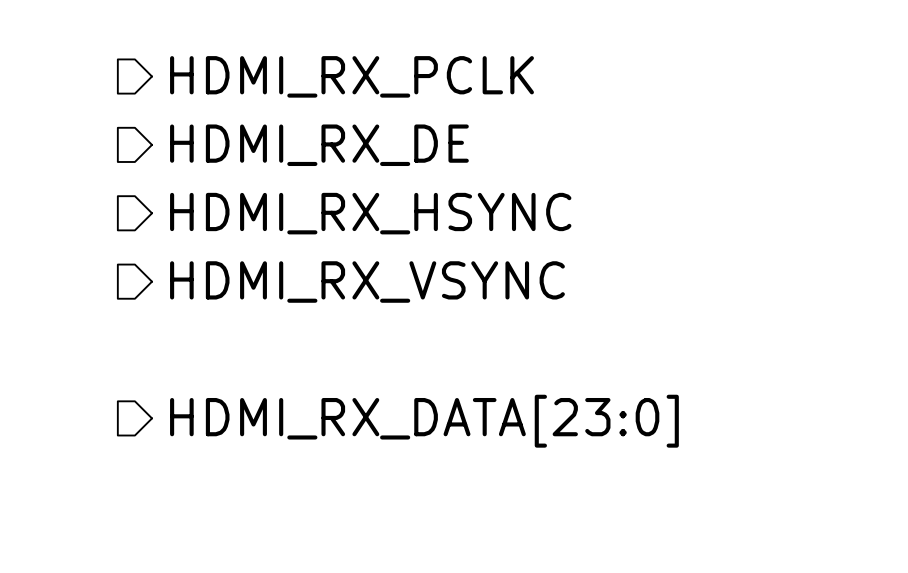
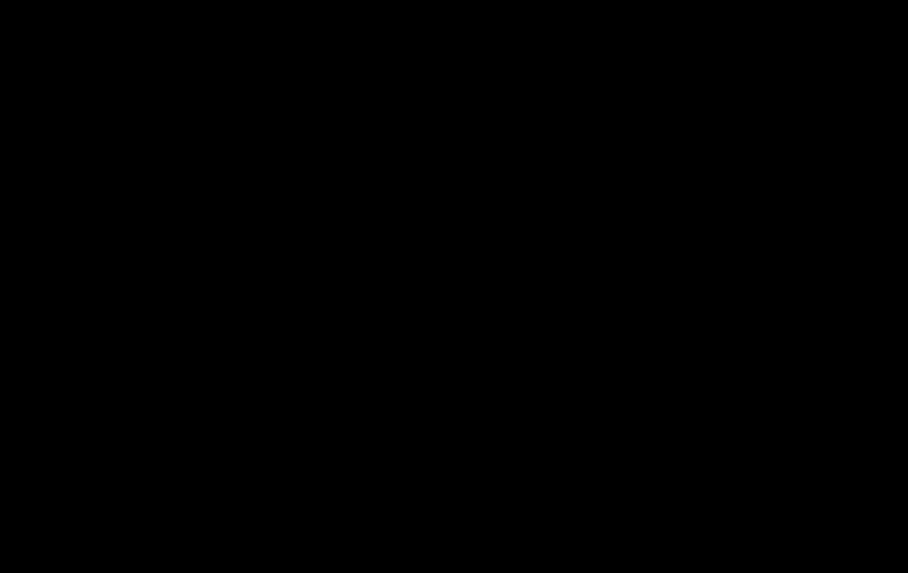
hierarchical label: HDMI_RX_PCLK (352, 76) -> none
hierarchical label: HDMI_RX_DE (319, 145) -> none
hierarchical label: HDMI_RX_HSYNC (370, 213) -> none
hierarchical label: HDMI_RX_VSYNC (367, 282) -> none
hierarchical label: HDMI_RX_DATA[23:0] (424, 421) -> none

